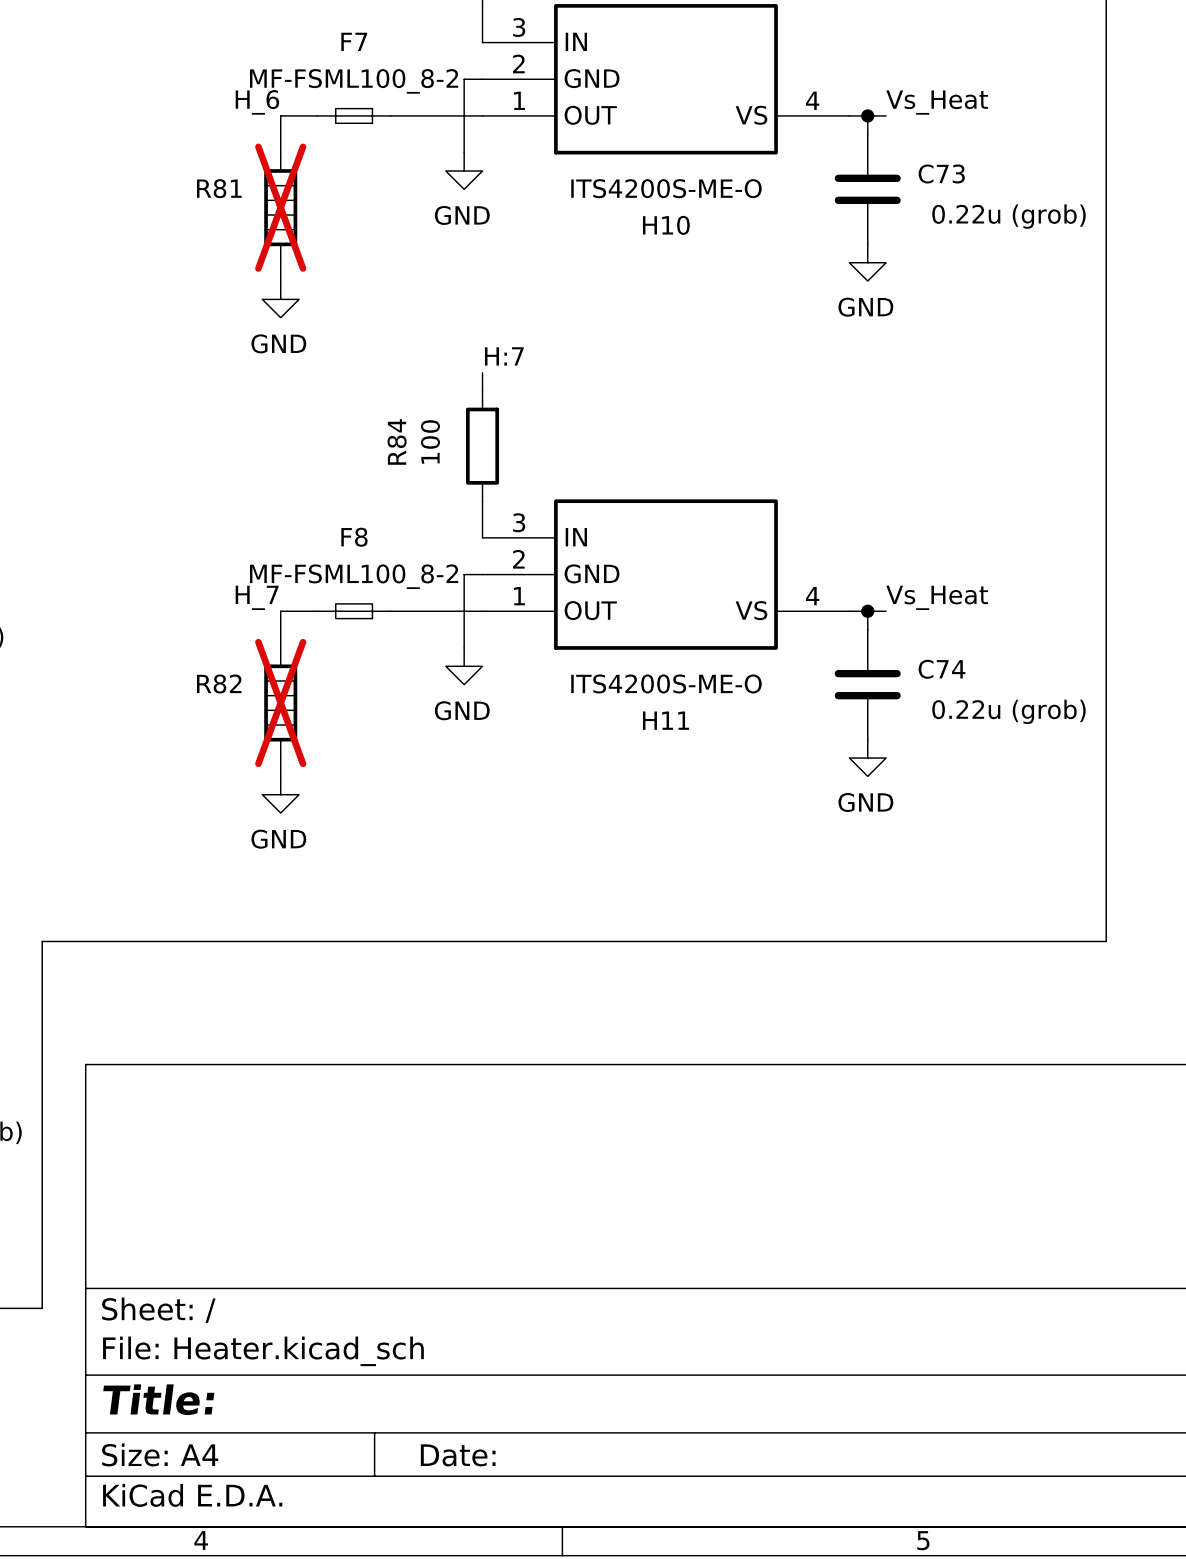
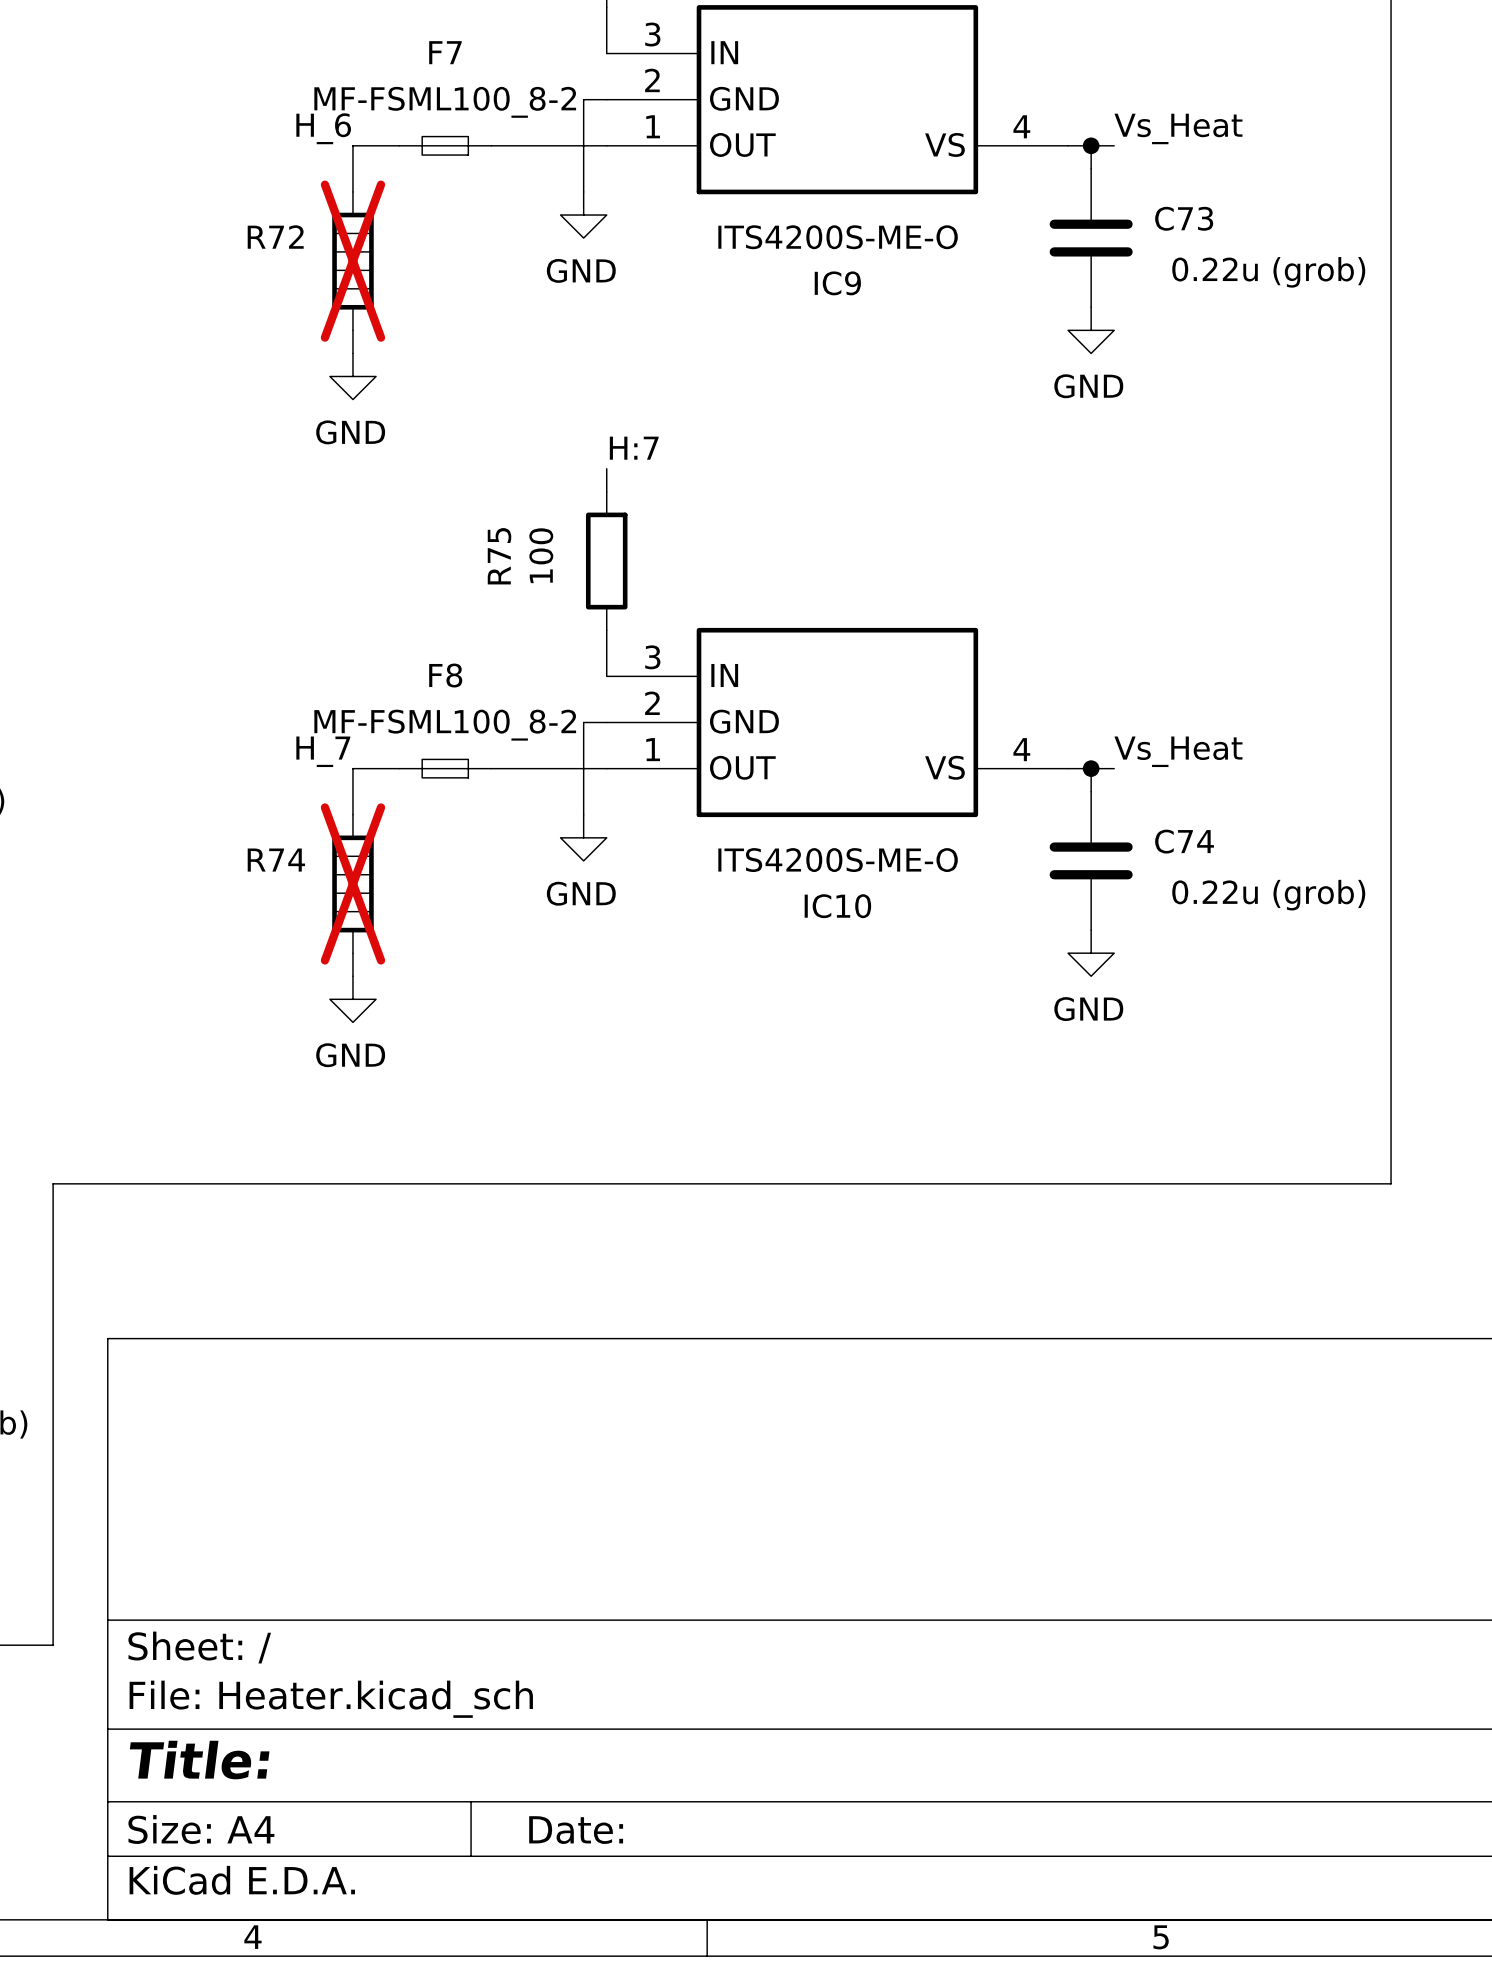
R81 name: R81 (219, 188) -> R72 (275, 237)
H10 name: H10 (666, 225) -> IC9 (837, 283)
R84 name: R84 (397, 441) -> R75 (499, 556)
R82 name: R82 (219, 683) -> R74 (276, 860)
H11 name: H11 (666, 720) -> IC10 (837, 906)

